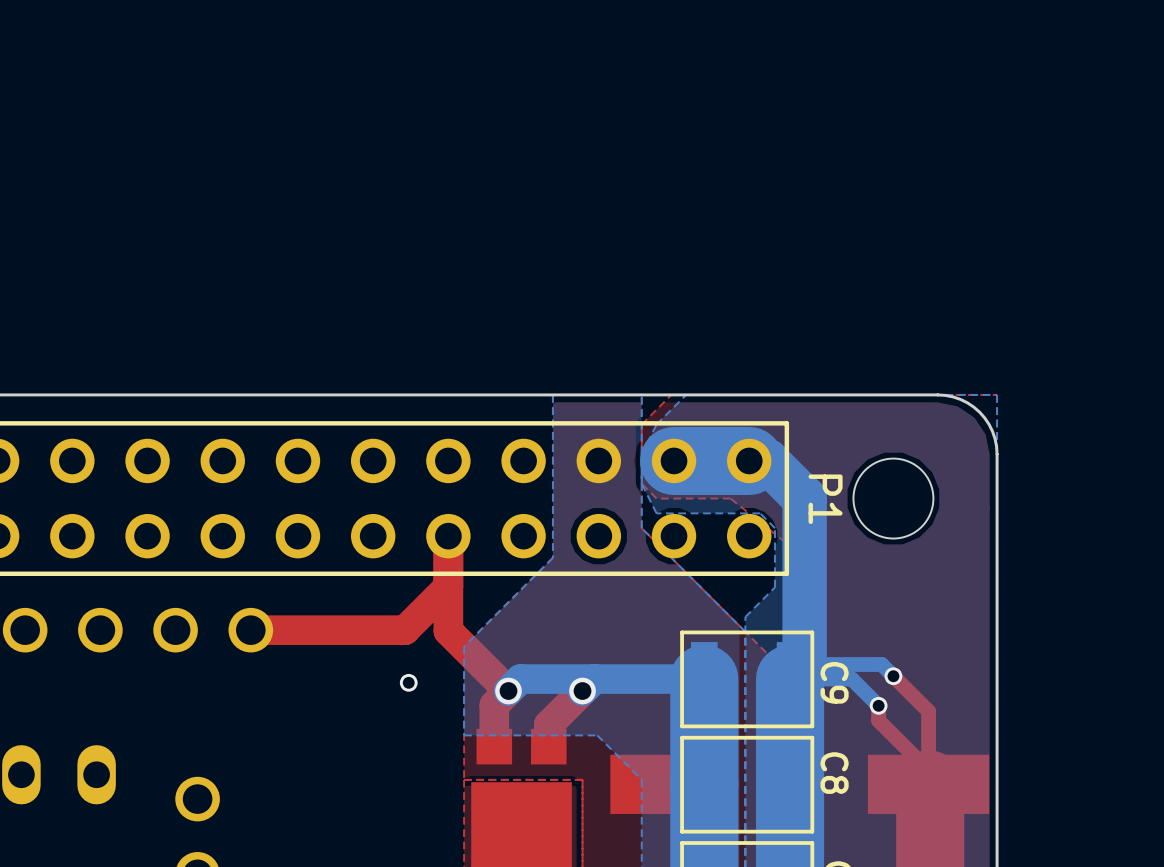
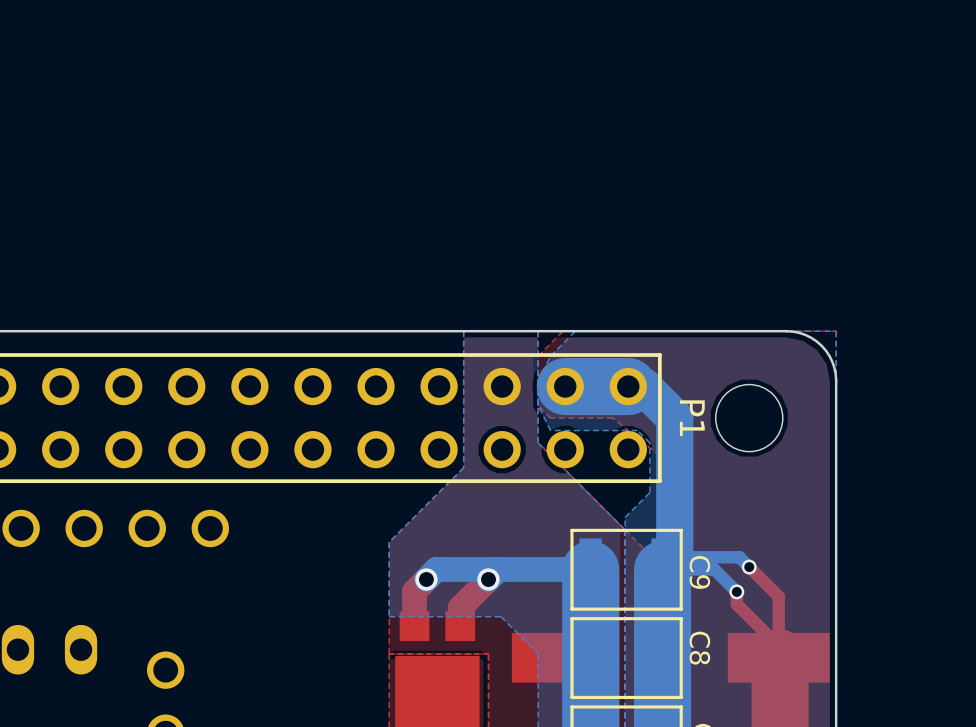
top track: (448, 536) (448, 631) (508, 691) -> none
top track: (448, 586) (404, 630) (250, 630) -> none
via: (408, 682) -> none

